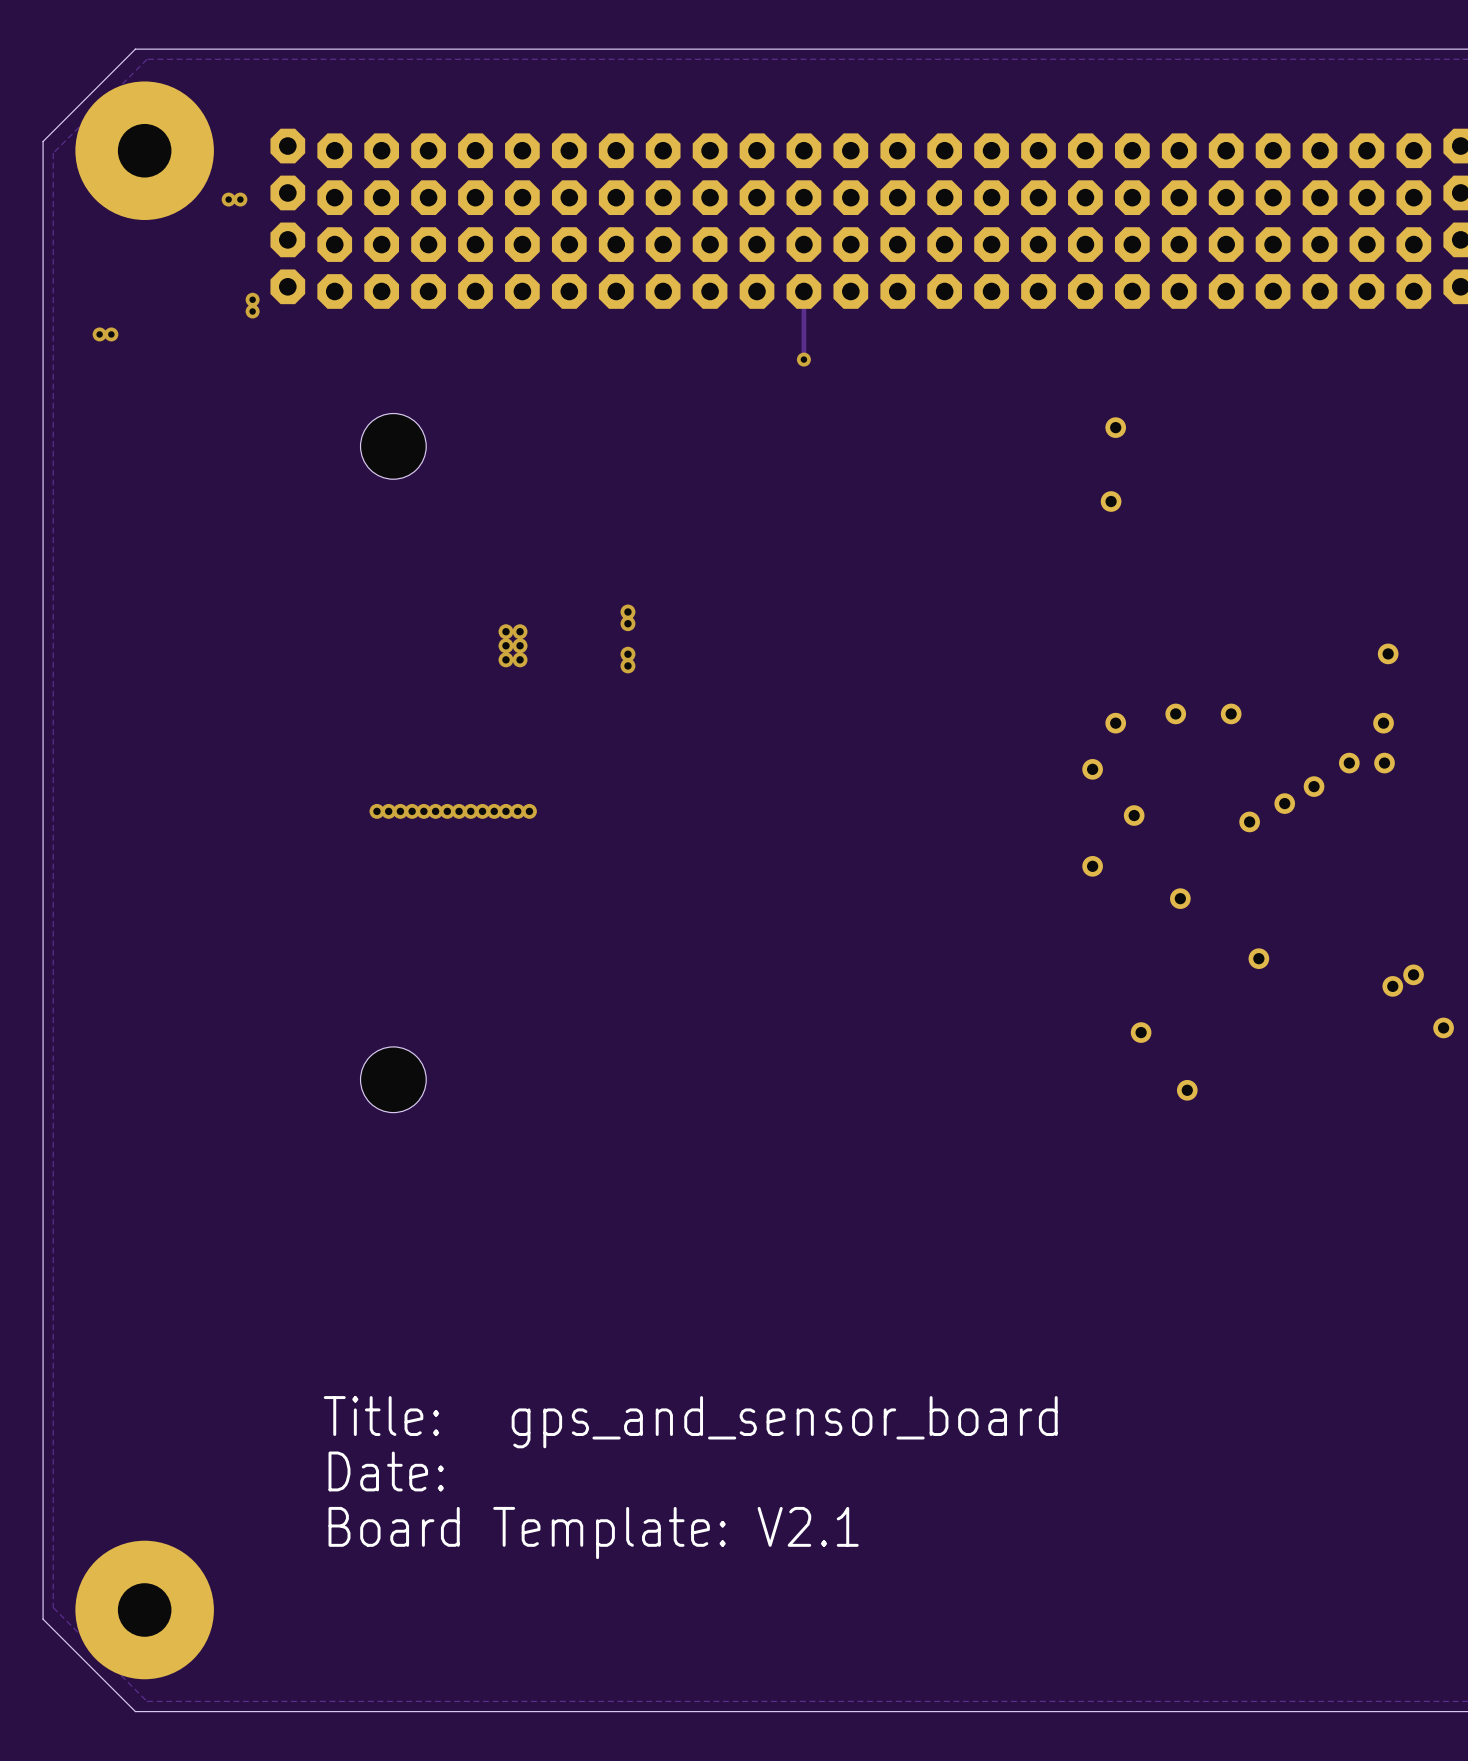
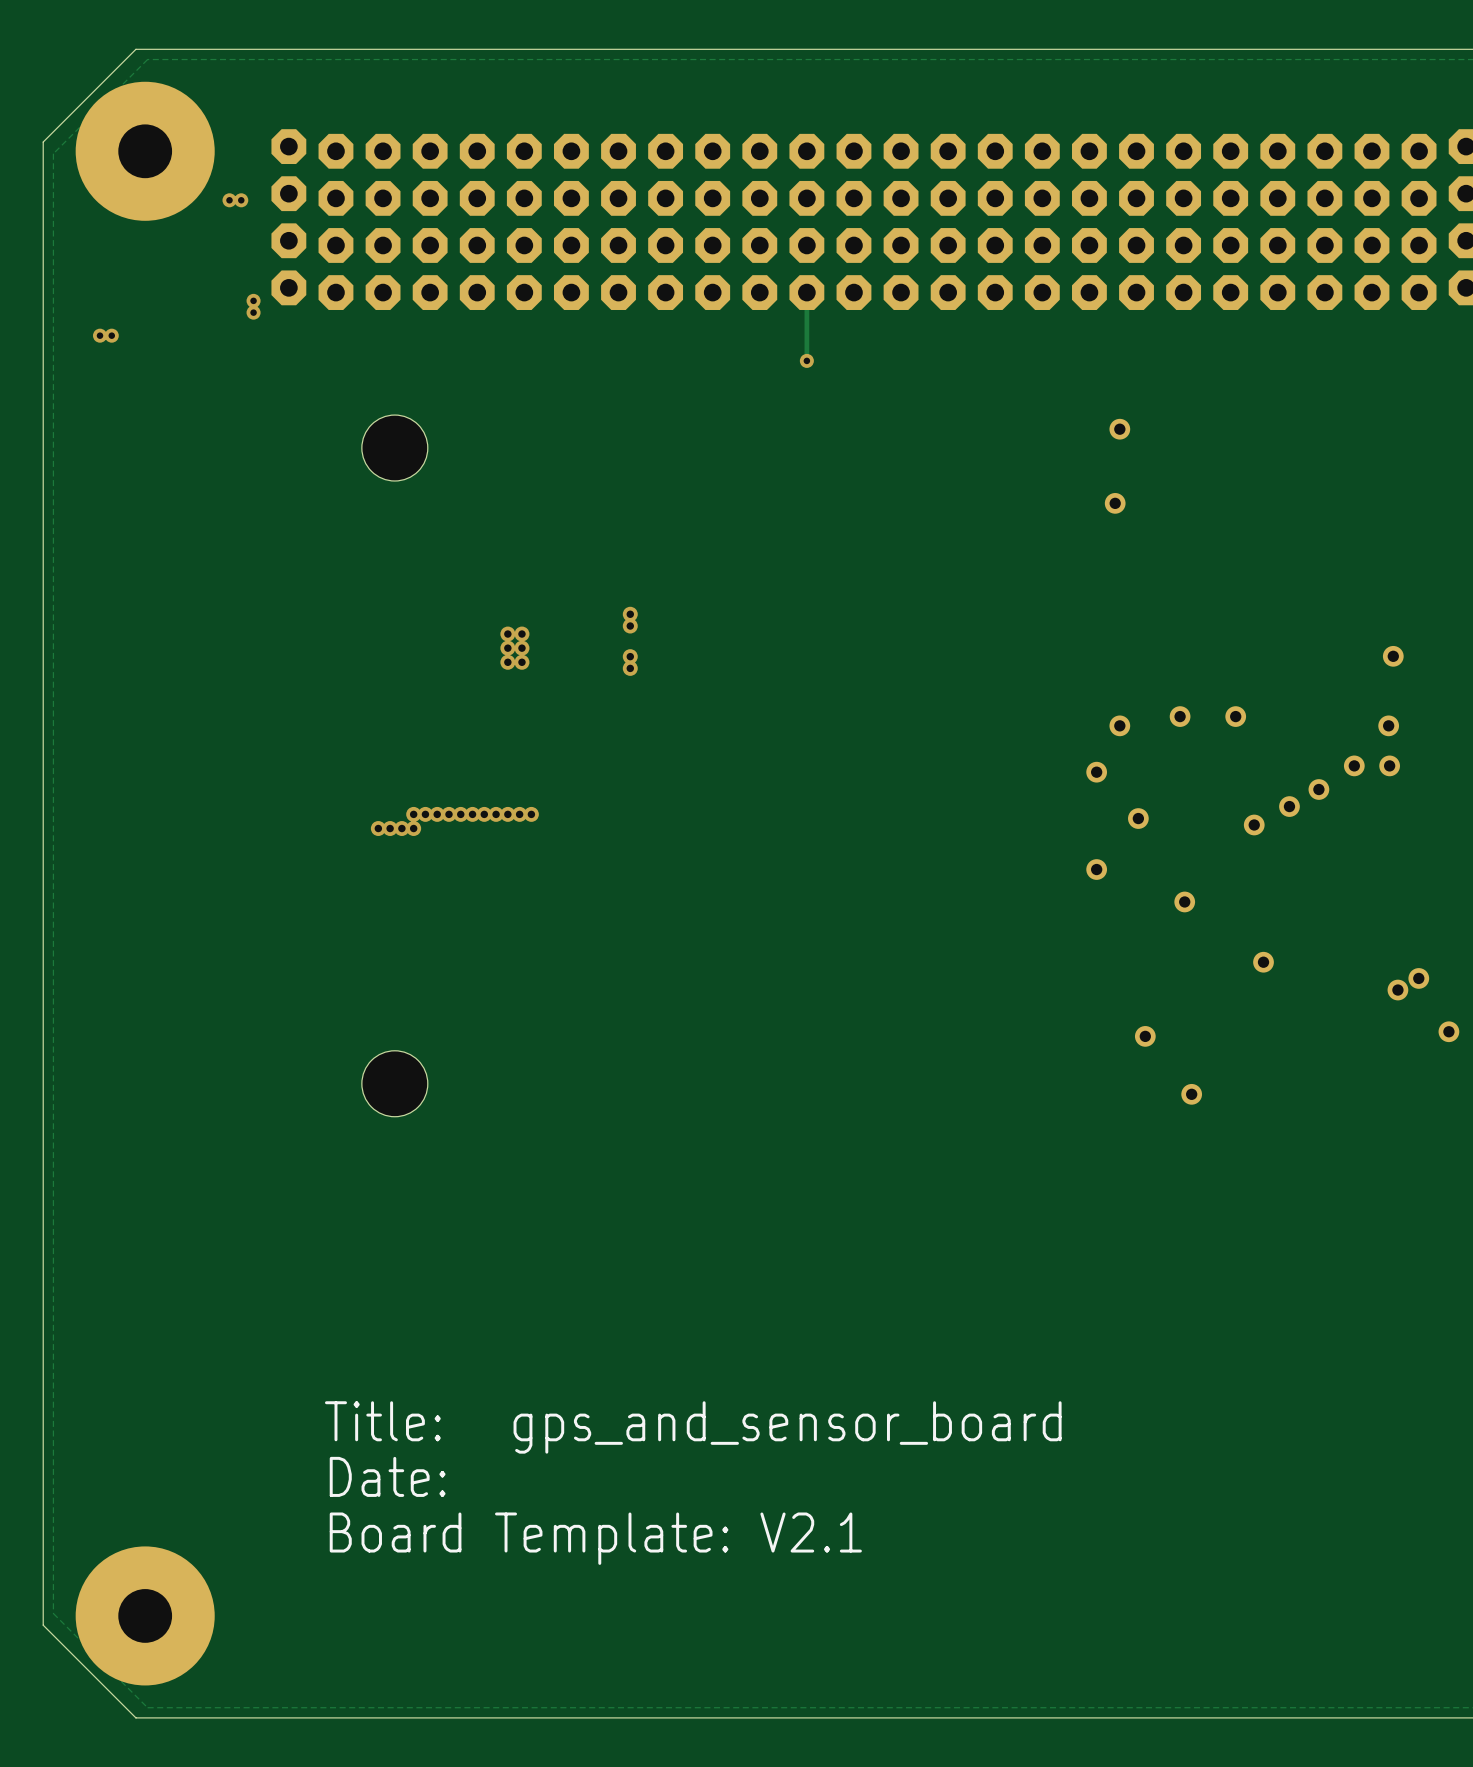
via: (376, 811) -> none
via: (388, 811) -> none
via: (400, 811) -> none
via: none -> (378, 828)
via: none -> (390, 828)
via: none -> (401, 828)
via: none -> (413, 828)

